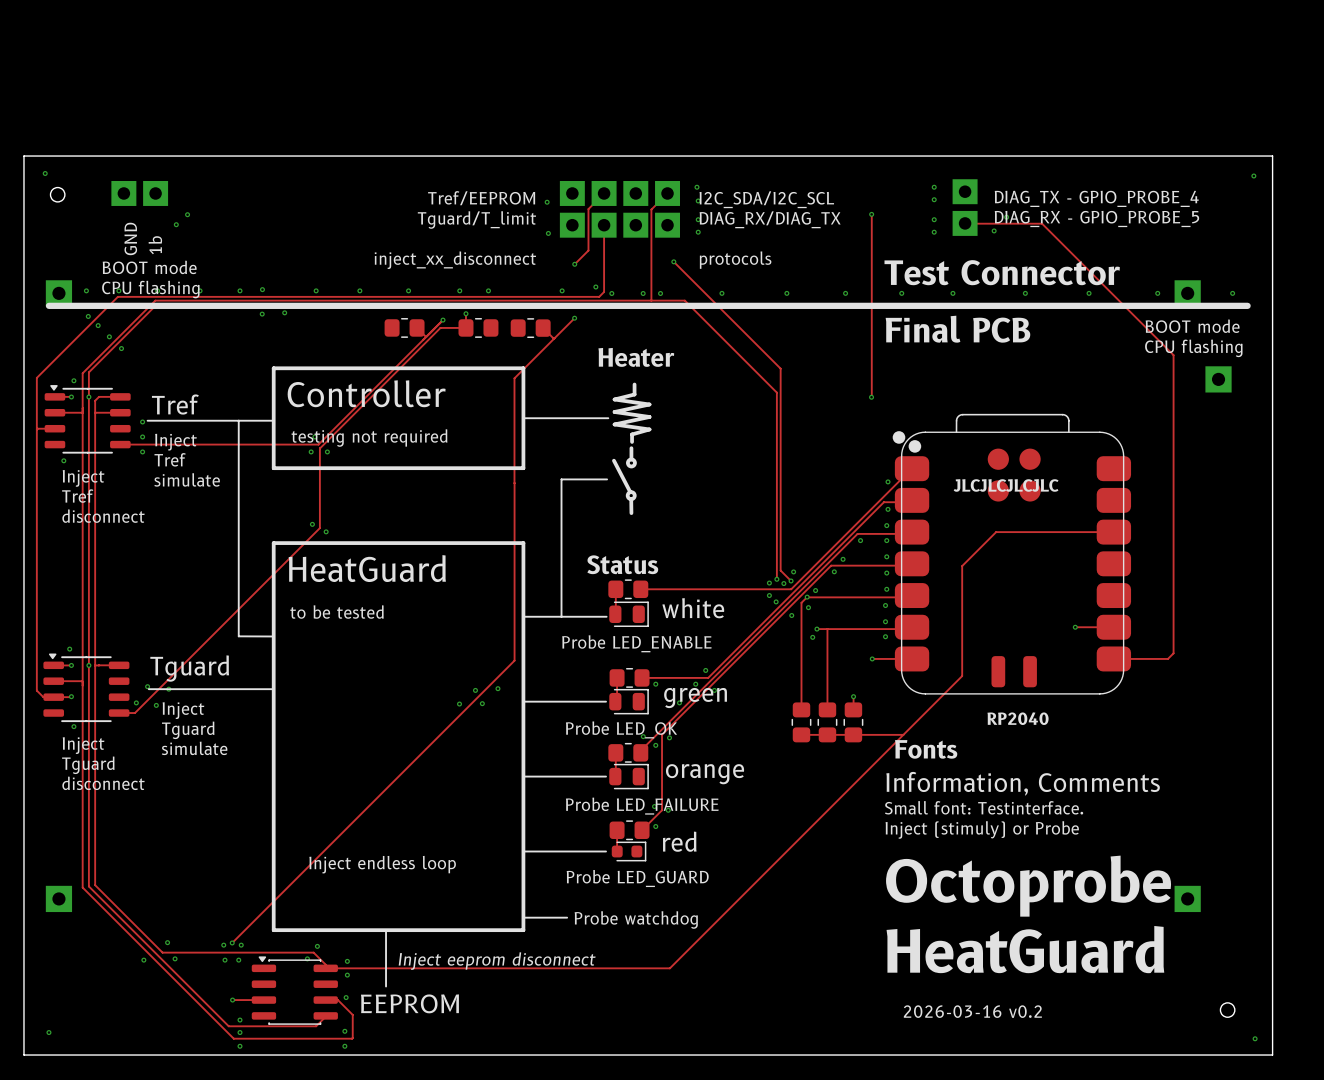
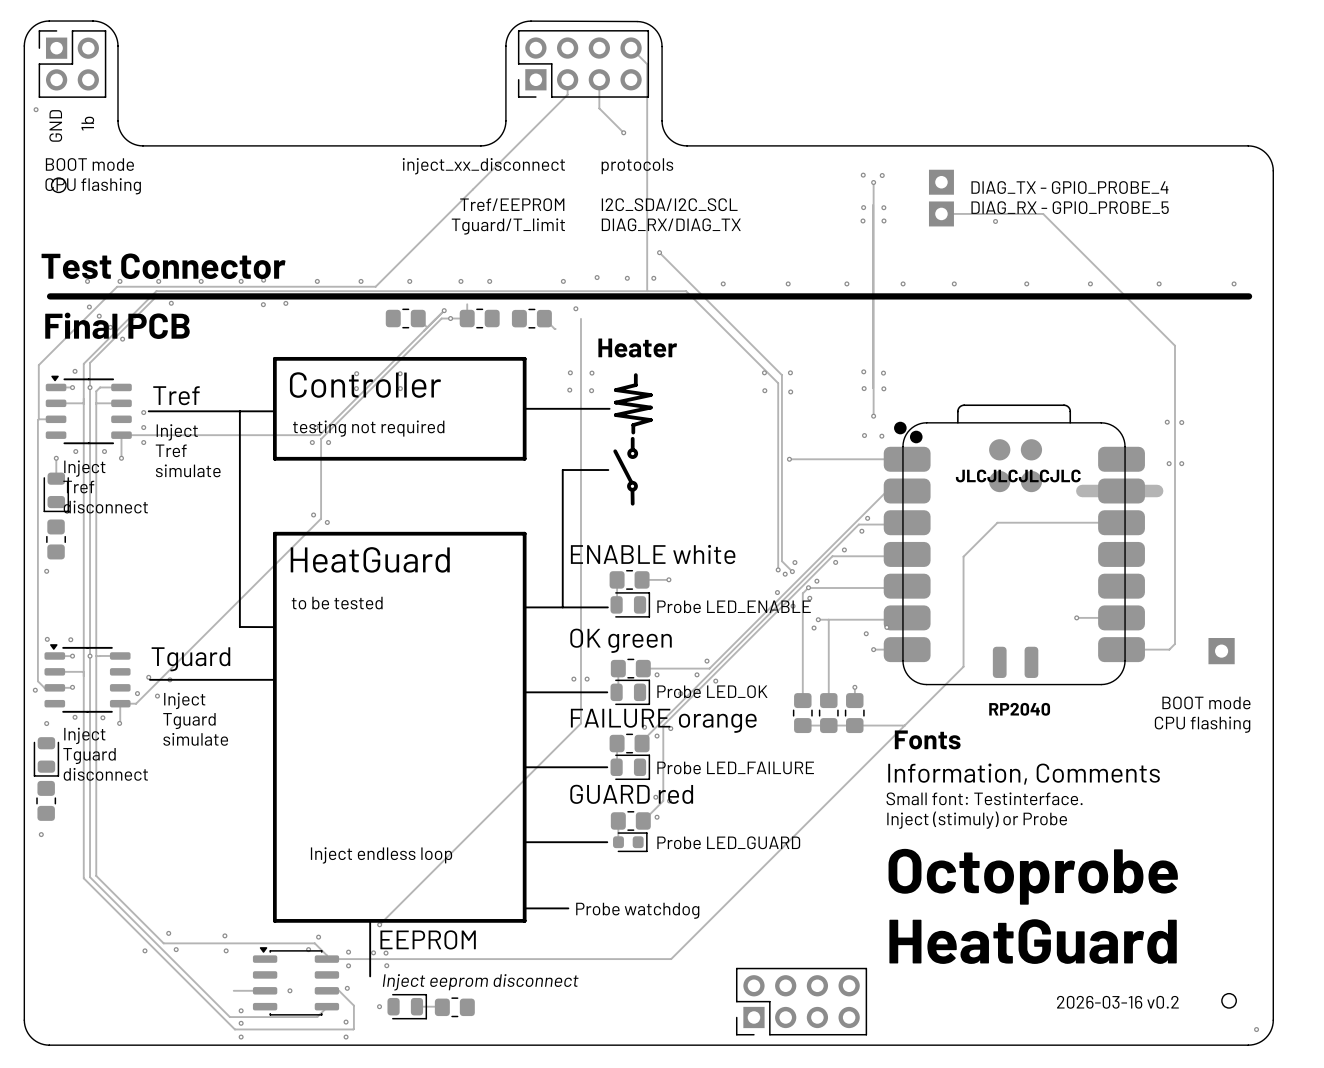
track: none -> (631, 48) (647, 64) (647, 291)
part: none -> (72, 64)
part: none -> (583, 63)
track: none -> (567, 79) (567, 94) (375, 286) (117, 286) (38, 365) (38, 419)
track: none -> (599, 79) (599, 108) (623, 132)
via: none -> (623, 132)
board edge: (23, 156) (23, 1055) (1272, 1055) (1272, 156) (23, 156) -> (49, 21) (41, 22) (31, 28) (26, 35) (24, 45) (24, 1020) (26, 1031) (33, 1039) (49, 1045) (1248, 1045) (1259, 1042) (1267, 1035) (1273, 1020) (1273, 170) (1270, 160) (1263, 151) (1248, 145) (681, 145) (669, 138) (662, 126) (662, 46) (660, 36) (649, 24) (637, 21) (531, 21) (515, 26) (508, 35) (506, 43) (505, 126) (498, 138) (486, 145) (140, 145) (125, 138) (118, 126) (117, 43) (112, 30) (103, 23) (95, 21) (49, 21)
via position: (45, 173) -> (36, 109)
via: (1253, 176) -> none
via: none -> (863, 175)
via: none -> (882, 175)
via: (696, 187) -> none
via: (934, 187) -> none
track: none -> (873, 182) (873, 416)
via: none -> (873, 182)
part: (139, 193) -> none
track: (604, 193) (588, 209) (588, 250) (574, 264) -> none
track: (667, 193) (651, 209) (651, 300) -> none
text position: Tref/EEPROM (481, 198) -> Tref/EEPROM (512, 204)
text position: DIAG_TX - GPIO_PROBE_4 (1096, 198) -> DIAG_TX - GPIO_PROBE_4 (1069, 187)
text position: I2C_SDA/I2C_SCL (766, 199) -> I2C_SDA/I2C_SCL (669, 204)
via: (934, 199) -> none
via: (698, 200) -> none
via: (547, 202) -> none
part position: (965, 207) -> (941, 198)
part: (572, 209) -> none
part: (604, 209) -> none
part: (635, 209) -> none
part: (667, 209) -> none
via: (187, 214) -> none
via: (871, 214) -> none
via: none -> (863, 207)
via: none -> (883, 207)
via: (1006, 217) -> none
text position: DIAG_RX - GPIO_PROBE_5 (1096, 218) -> DIAG_RX - GPIO_PROBE_5 (1070, 207)
text position: Tguard/T_limit (476, 219) -> Tguard/T_limit (508, 226)
via: (698, 219) -> none
text position: DIAG_RX/DIAG_TX (770, 219) -> DIAG_RX/DIAG_TX (671, 224)
via: (934, 219) -> none
track: (965, 223) (1042, 223) -> (941, 213) (1043, 214)
via: (176, 224) -> none
track: (604, 225) (604, 291) (599, 296) (117, 296) (36, 377) (36, 429) -> none
via: none -> (863, 220)
via: none -> (883, 220)
via: (698, 232) -> none
via: (934, 232) -> none
via: (548, 233) -> none
text position: GND (130, 238) -> GND (55, 125)
text position: 1b (155, 245) -> 1b (87, 123)
text position: inject_xx_disconnect (455, 260) -> inject_xx_disconnect (483, 166)
text position: protocols (735, 260) -> protocols (637, 166)
track: (673, 261) (780, 368) (780, 384) -> (659, 252) (781, 375)
via position: (673, 261) -> (659, 252)
via: (574, 264) -> none
text position: BOOT mode (149, 267) -> BOOT mode (89, 164)
text: Test Connector (1002, 272) -> none
text: none -> Test Connector (163, 266)
via: none -> (627, 278)
via: none -> (653, 278)
text position: CPU flashing (150, 289) -> CPU flashing (93, 186)
part: (58, 293) -> none
via: (611, 293) -> none
via: (643, 293) -> none
via: (660, 293) -> none
part: (1187, 293) -> none
via: none -> (171, 303)
via position: (465, 313) -> (450, 318)
track: (574, 318) (514, 378) (514, 483) -> none
text: BOOT mode (1192, 326) -> none
track: none -> (580, 318) (580, 723) (379, 924)
text: Final PCB (957, 329) -> none
text: none -> Final PCB (117, 325)
text: CPU flashing (1193, 348) -> none
part: (1218, 379) -> none
via: none -> (863, 371)
via: none -> (570, 372)
via: none -> (591, 373)
via: none -> (764, 372)
via: none -> (790, 372)
via: none -> (883, 373)
via: none -> (356, 373)
via: none -> (400, 373)
via: (871, 397) -> none
via: none -> (356, 388)
via: none -> (400, 388)
via: none -> (864, 388)
via: none -> (883, 388)
via: none -> (569, 390)
via: none -> (591, 390)
via: none -> (764, 390)
via: none -> (790, 391)
part footprint: [892, 413, 1132, 695] -> [883, 404, 1145, 686]
via: none -> (873, 416)
via: none -> (1167, 422)
via: none -> (1181, 422)
track: none -> (121, 435) (121, 458)
via: none -> (864, 435)
via: none -> (881, 436)
via: (63, 460) -> none
via: none -> (75, 451)
via: none -> (104, 451)
track: none -> (56, 458) (56, 478)
via: none -> (56, 458)
via: none -> (121, 458)
track: none -> (789, 459) (907, 459)
via: none -> (789, 459)
track: (910, 470) (791, 589) (667, 589) -> none
via: none -> (1169, 463)
via: none -> (1181, 463)
via: (888, 481) -> none
track: (514, 483) (514, 660) (232, 942) -> none
track: none -> (1082, 491) (1157, 491)
part: none -> (56, 492)
track: (883, 502) (910, 502) -> none
via: (888, 509) -> none
via: (886, 525) -> none
via: none -> (867, 518)
via: (886, 540) -> none
part: none -> (56, 539)
via: (886, 556) -> none
text: none -> ENABLE white (653, 554)
text: Status (622, 564) -> none
via: (886, 573) -> none
via: none -> (46, 571)
via: (769, 583) -> none
via: none -> (668, 579)
via: (886, 589) -> none
via: (769, 595) -> none
via: (885, 605) -> none
text: white (693, 608) -> none
via: (885, 621) -> none
text position: Probe LED_ENABLE (636, 643) -> Probe LED_ENABLE (734, 606)
via: none -> (866, 633)
via: none -> (47, 639)
text: none -> OK green (621, 640)
part: none -> (1221, 651)
via: (497, 688) -> none
via: none -> (573, 679)
via: none -> (587, 679)
via: (475, 690) -> none
text: green (695, 698) -> none
via: none -> (35, 690)
via: (482, 703) -> none
via: (459, 704) -> none
text: none -> BOOT mode (1206, 702)
track: none -> (120, 703) (119, 723)
via: none -> (102, 717)
text position: Probe LED_OK (621, 729) -> Probe LED_OK (712, 691)
text: none -> FAILURE orange (663, 720)
via: none -> (46, 723)
via: none -> (119, 723)
text: none -> CPU flashing (1202, 724)
part: none -> (46, 756)
text: orange (705, 774) -> none
text: none -> GUARD red (631, 794)
text position: Probe LED_FAILURE (642, 806) -> Probe LED_FAILURE (735, 767)
part: none -> (46, 800)
text: red (679, 841) -> none
via: none -> (41, 834)
text position: Probe LED_GUARD (637, 878) -> Probe LED_GUARD (728, 842)
part: (58, 898) -> none
part: (1187, 898) -> none
line: (386, 930) (386, 986) -> (370, 920) (370, 976)
via: none -> (379, 924)
via: (232, 942) -> none
via: (241, 945) -> none
via: (238, 960) -> none
text position: Inject eeprom disconnect (497, 961) -> Inject eeprom disconnect (480, 982)
via: none -> (373, 952)
via: none -> (386, 953)
via: none -> (386, 965)
via: (232, 1000) -> none
via: none -> (289, 990)
text position: EEPROM (409, 1003) -> EEPROM (428, 939)
part: none -> (801, 1001)
text position: 2026-03-16 v0.2 (972, 1011) -> 2026-03-16 v0.2 (1117, 1002)
via: none -> (379, 1006)
part: none -> (407, 1006)
track: none -> (416, 1006) (441, 1006)
part: none -> (454, 1007)
via: (48, 1032) -> none

